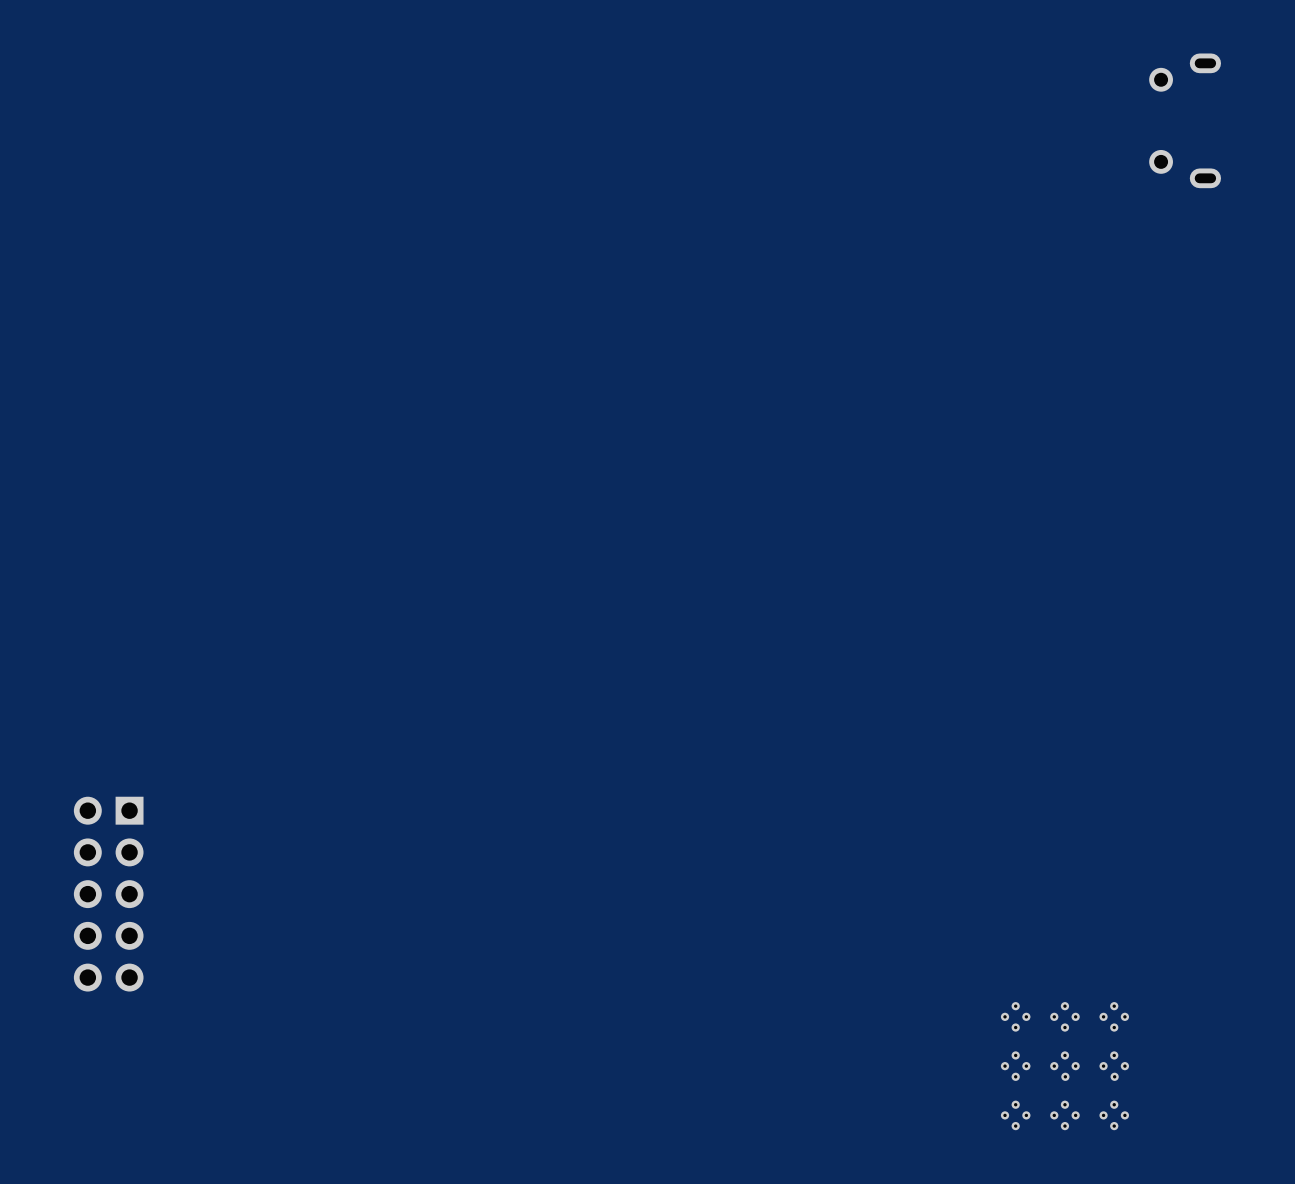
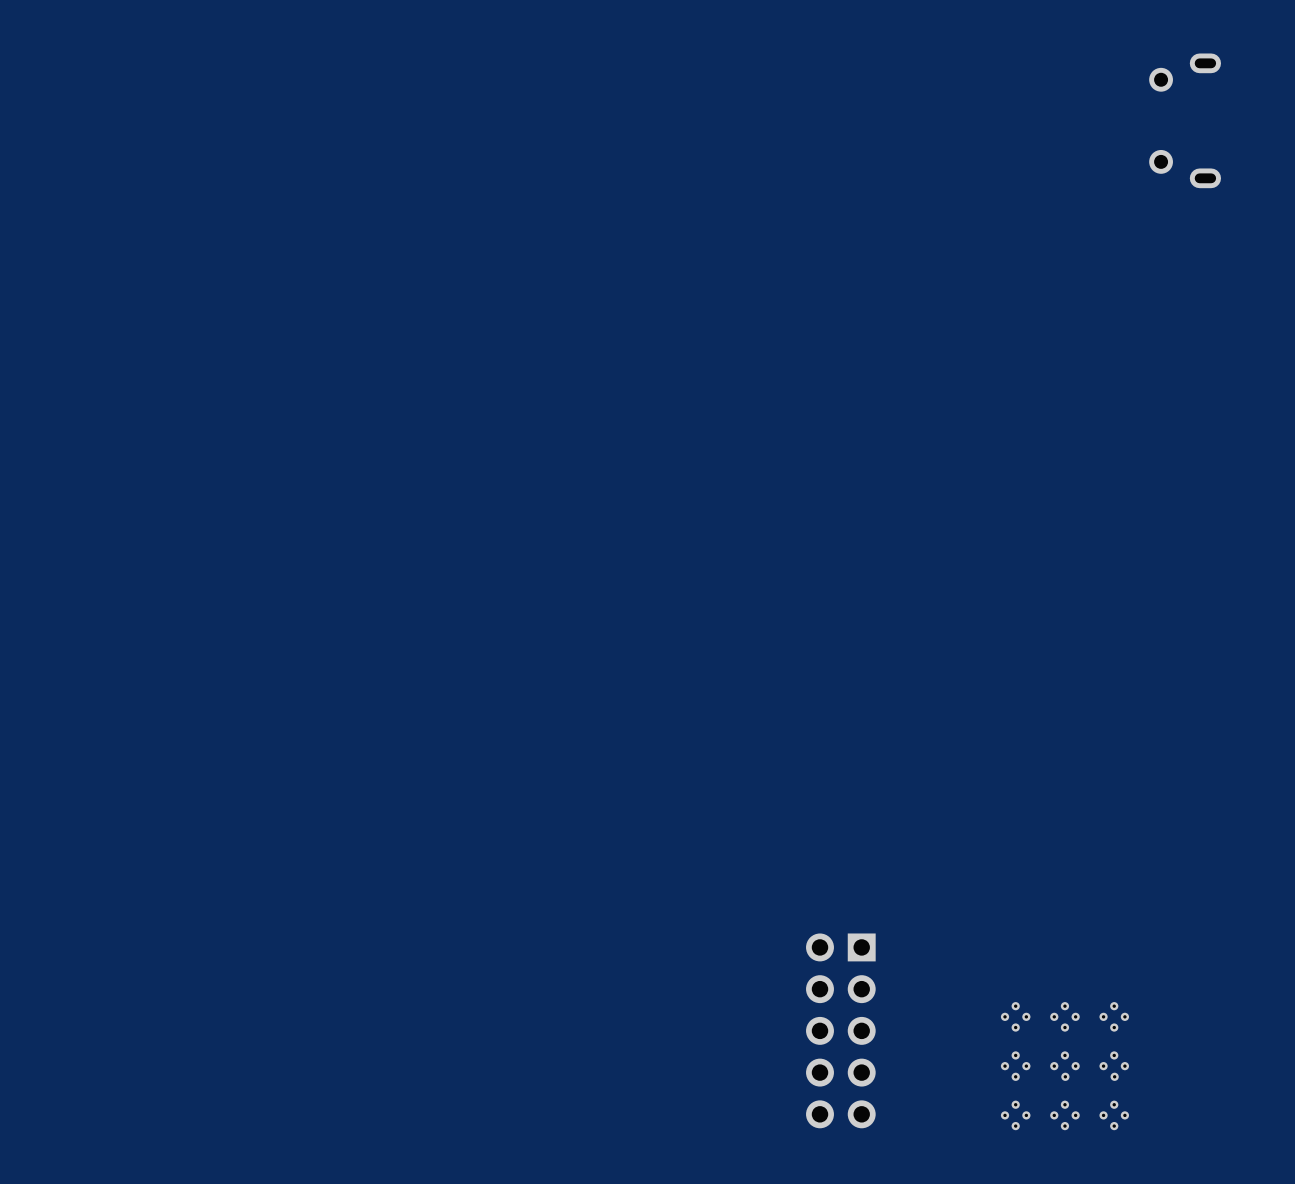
part: (108, 894) -> none
part: none -> (840, 1030)

